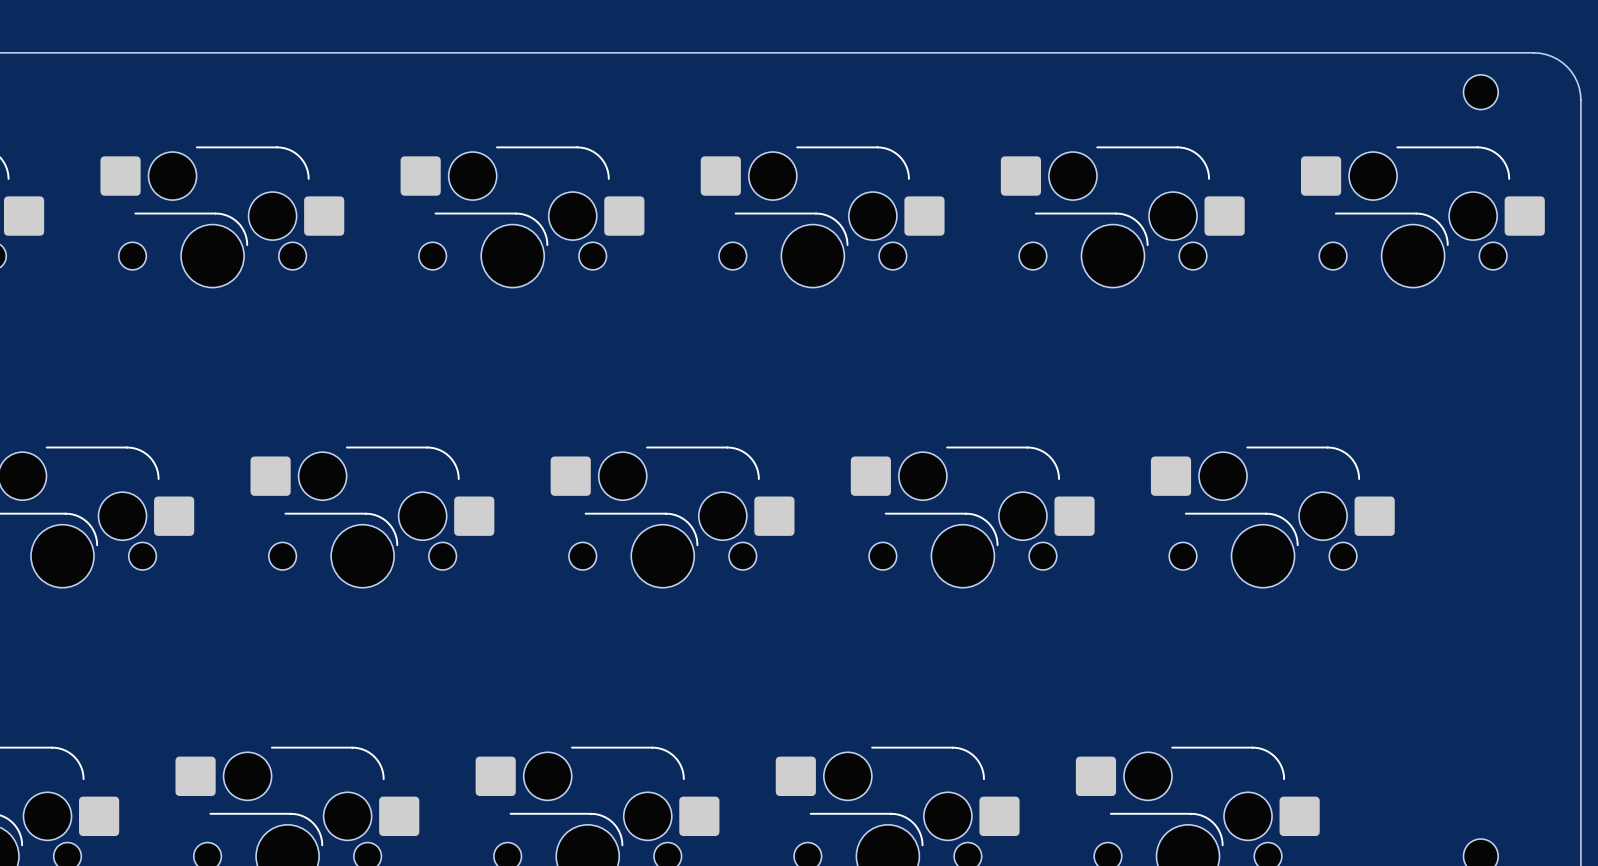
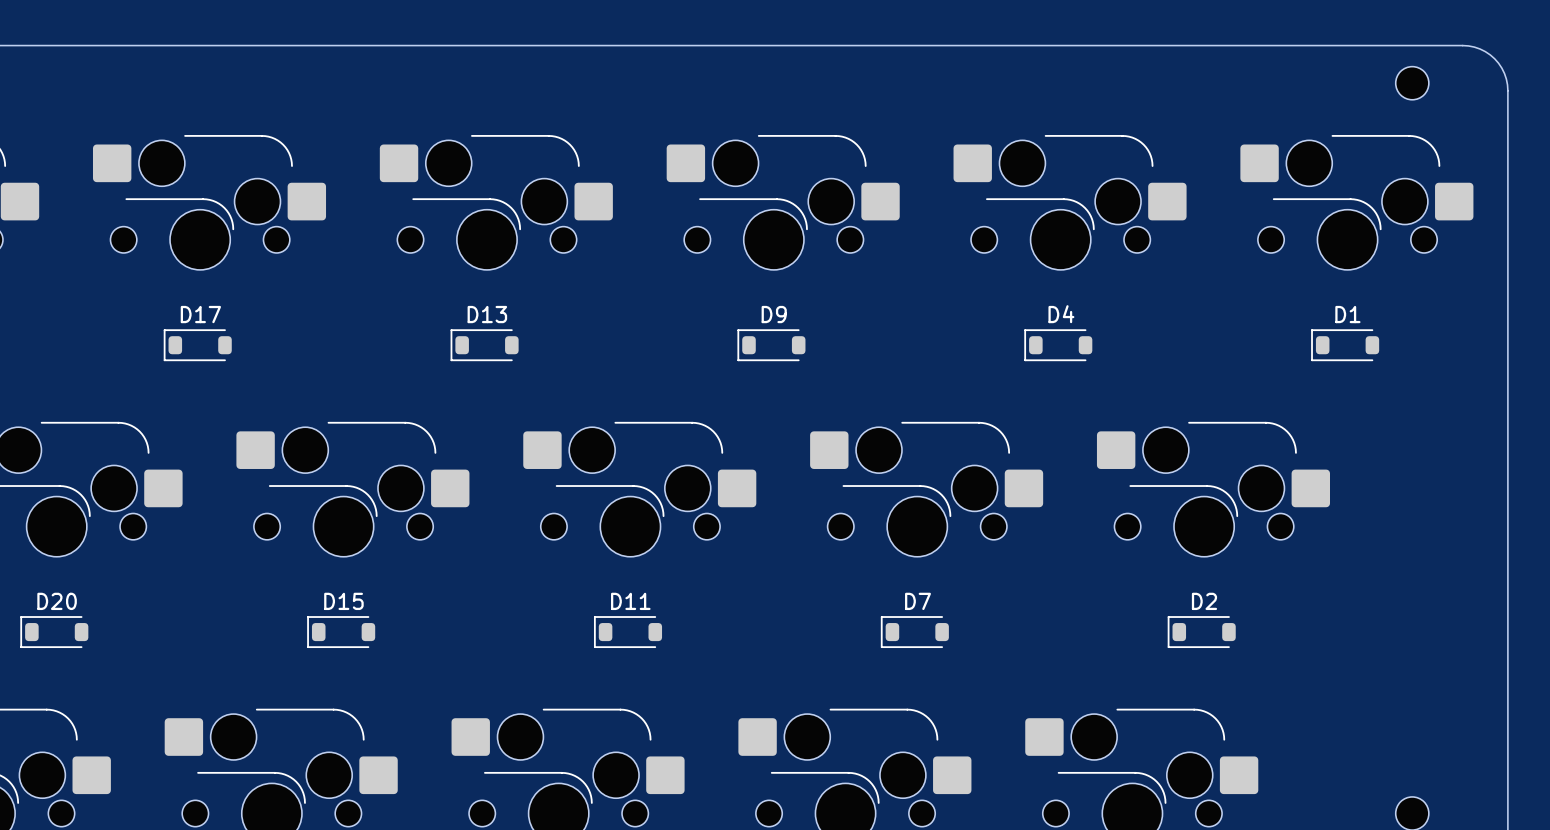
D17: none -> (197, 345)
D13: none -> (484, 345)
D9: none -> (771, 345)
D4: none -> (1058, 345)
D1: none -> (1345, 345)
D20: none -> (54, 632)
D15: none -> (341, 632)
D11: none -> (628, 632)
D7: none -> (914, 632)
D2: none -> (1201, 632)

